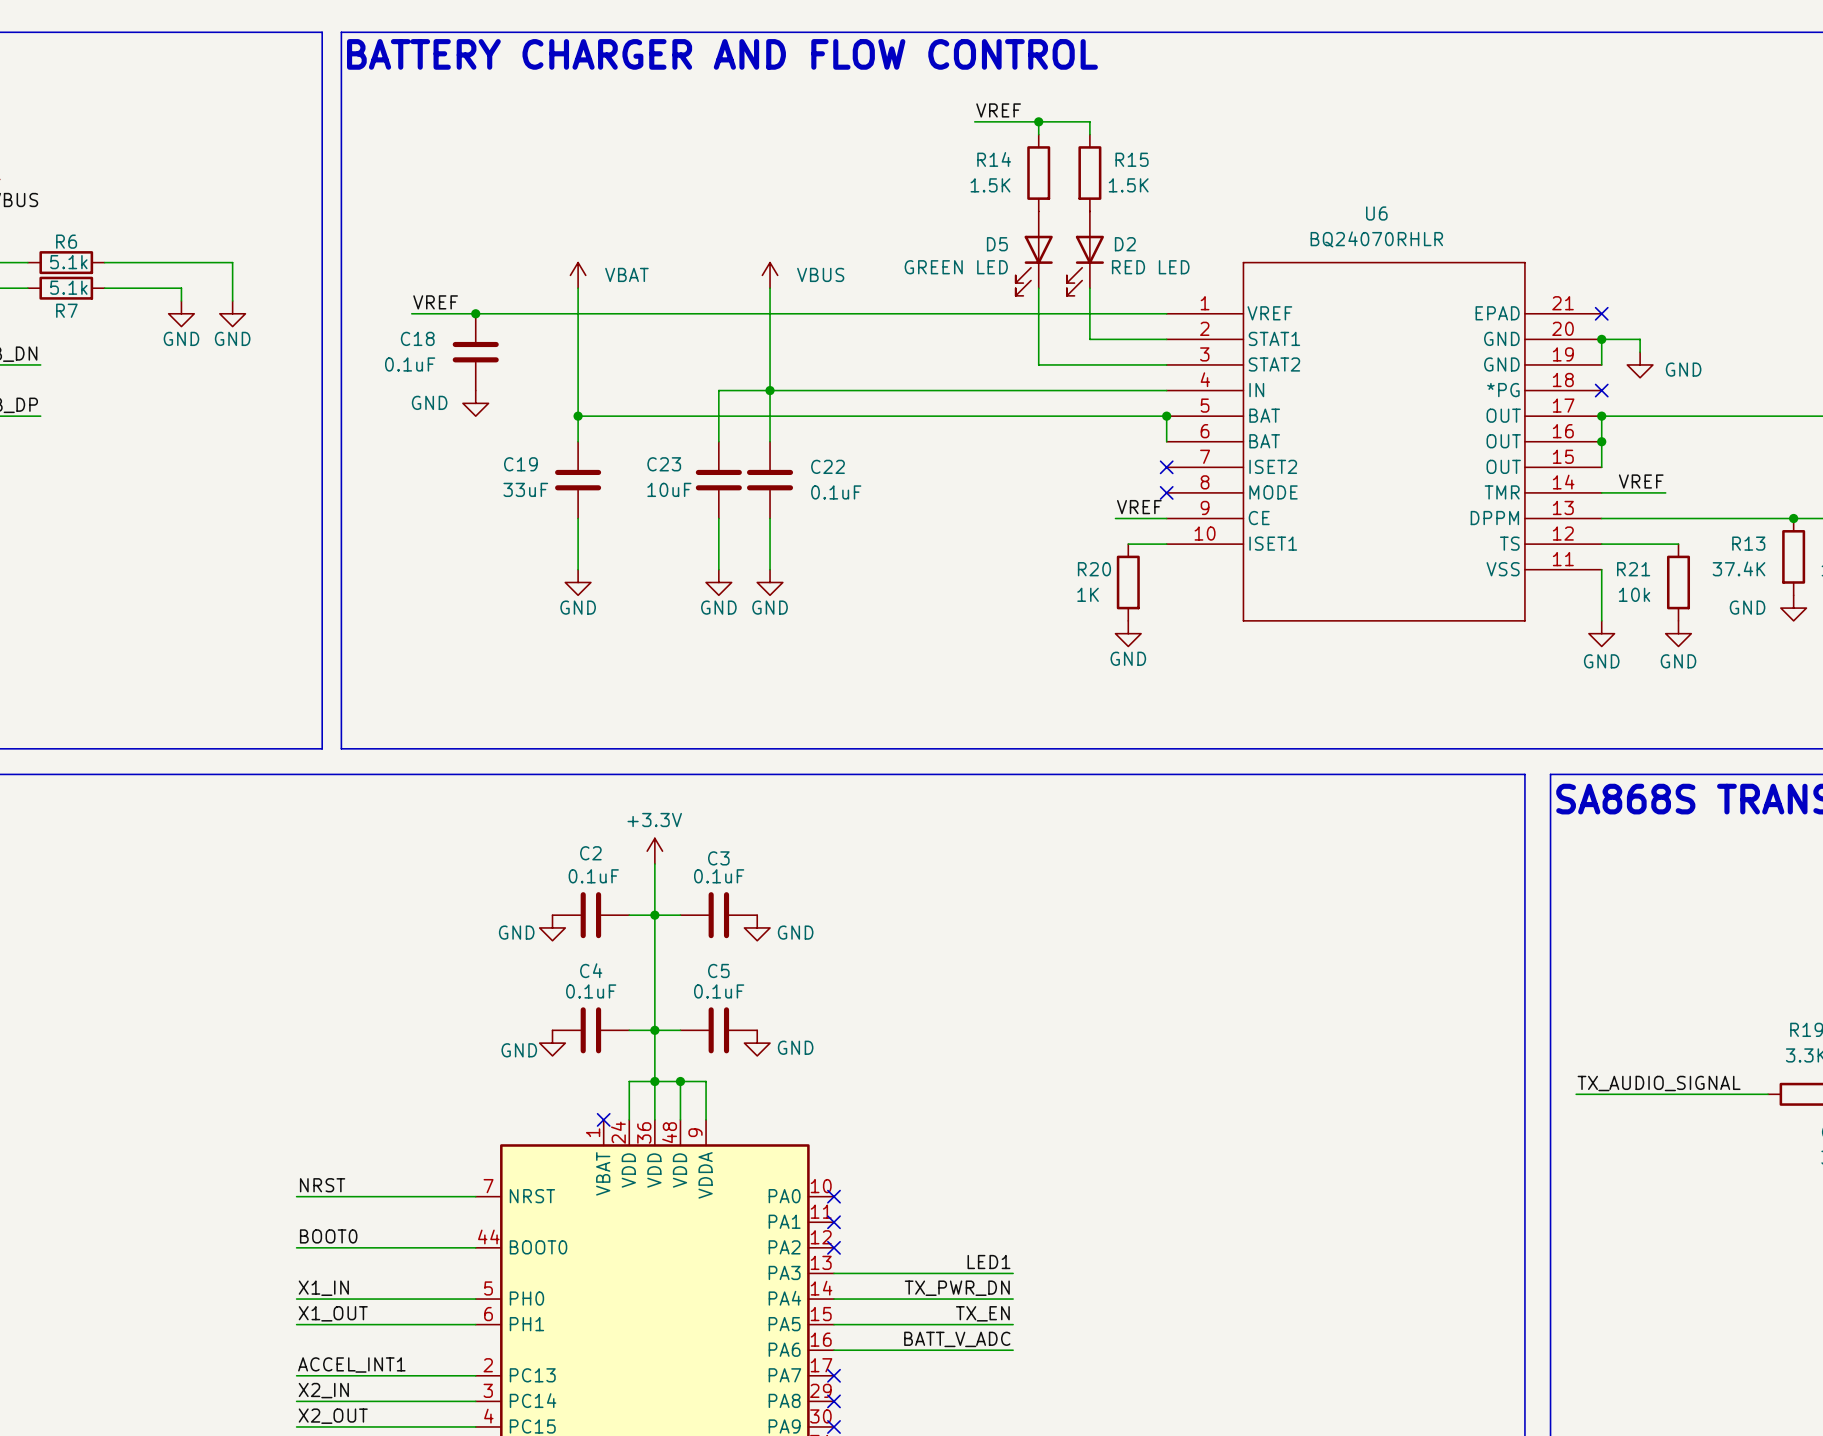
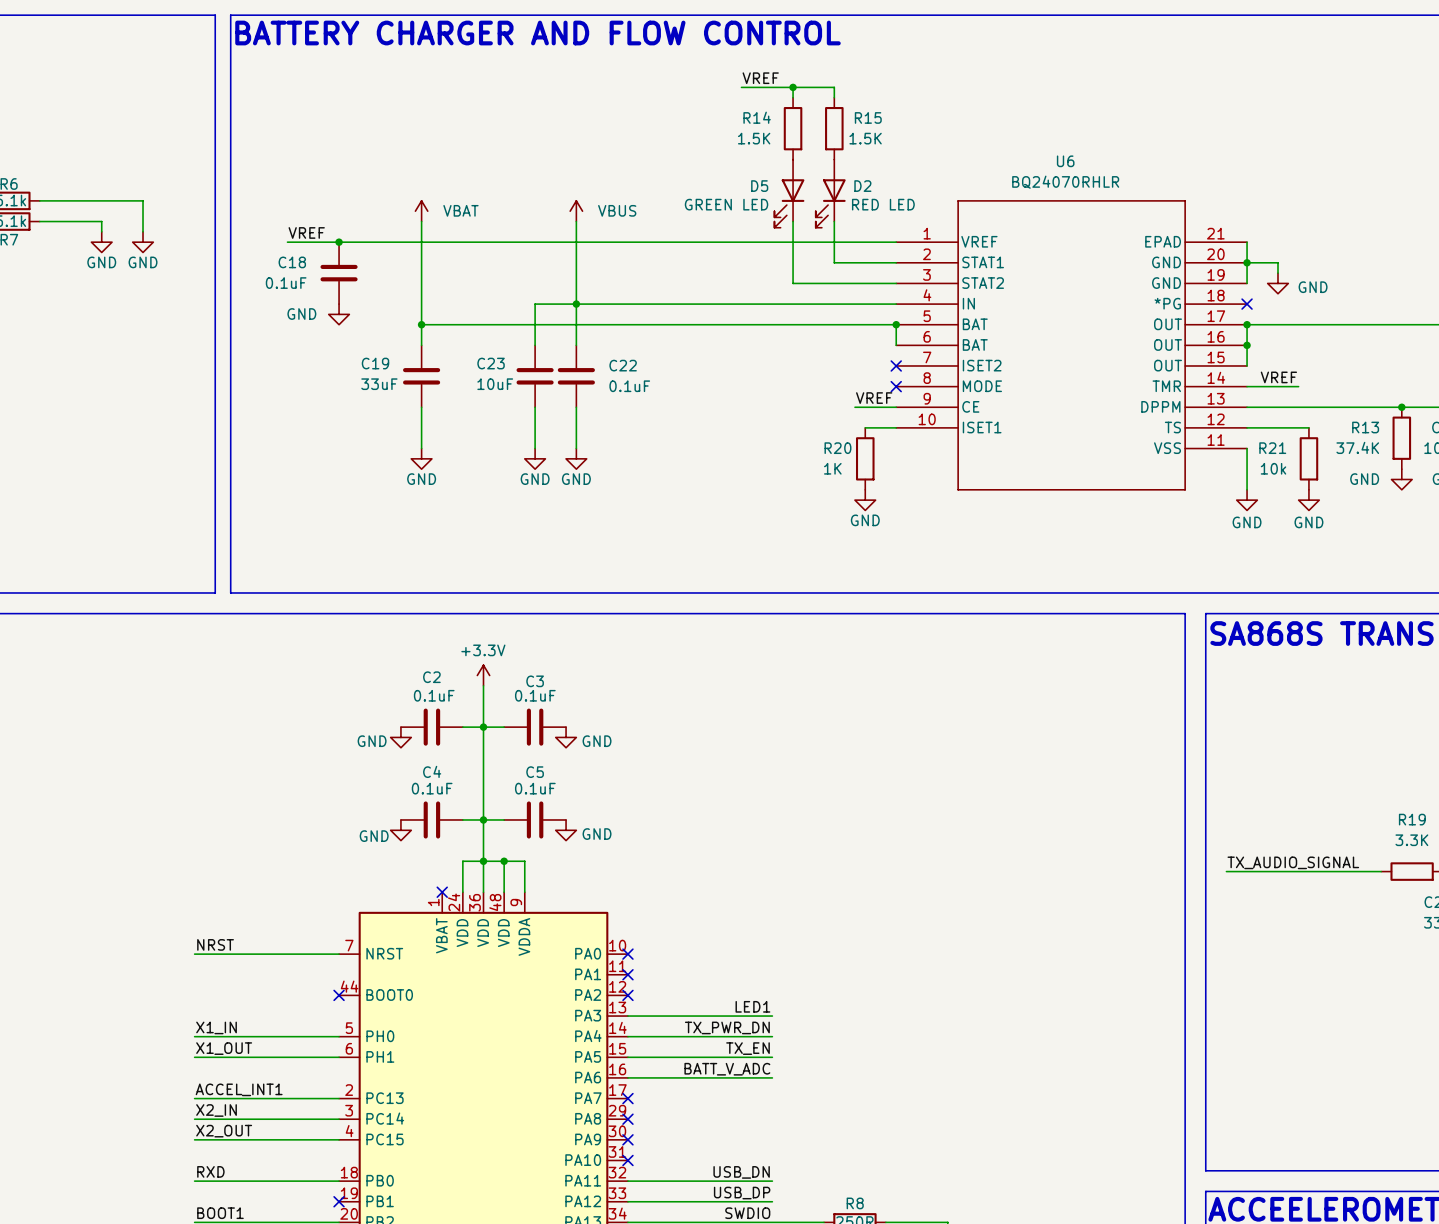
wire: none -> (1247, 242) (1247, 262)
no-connect mark: (1601, 313) -> none
label: BOOT0 (328, 1236) -> none
wire: (296, 1247) (475, 1247) -> none
no-connect mark: none -> (339, 995)

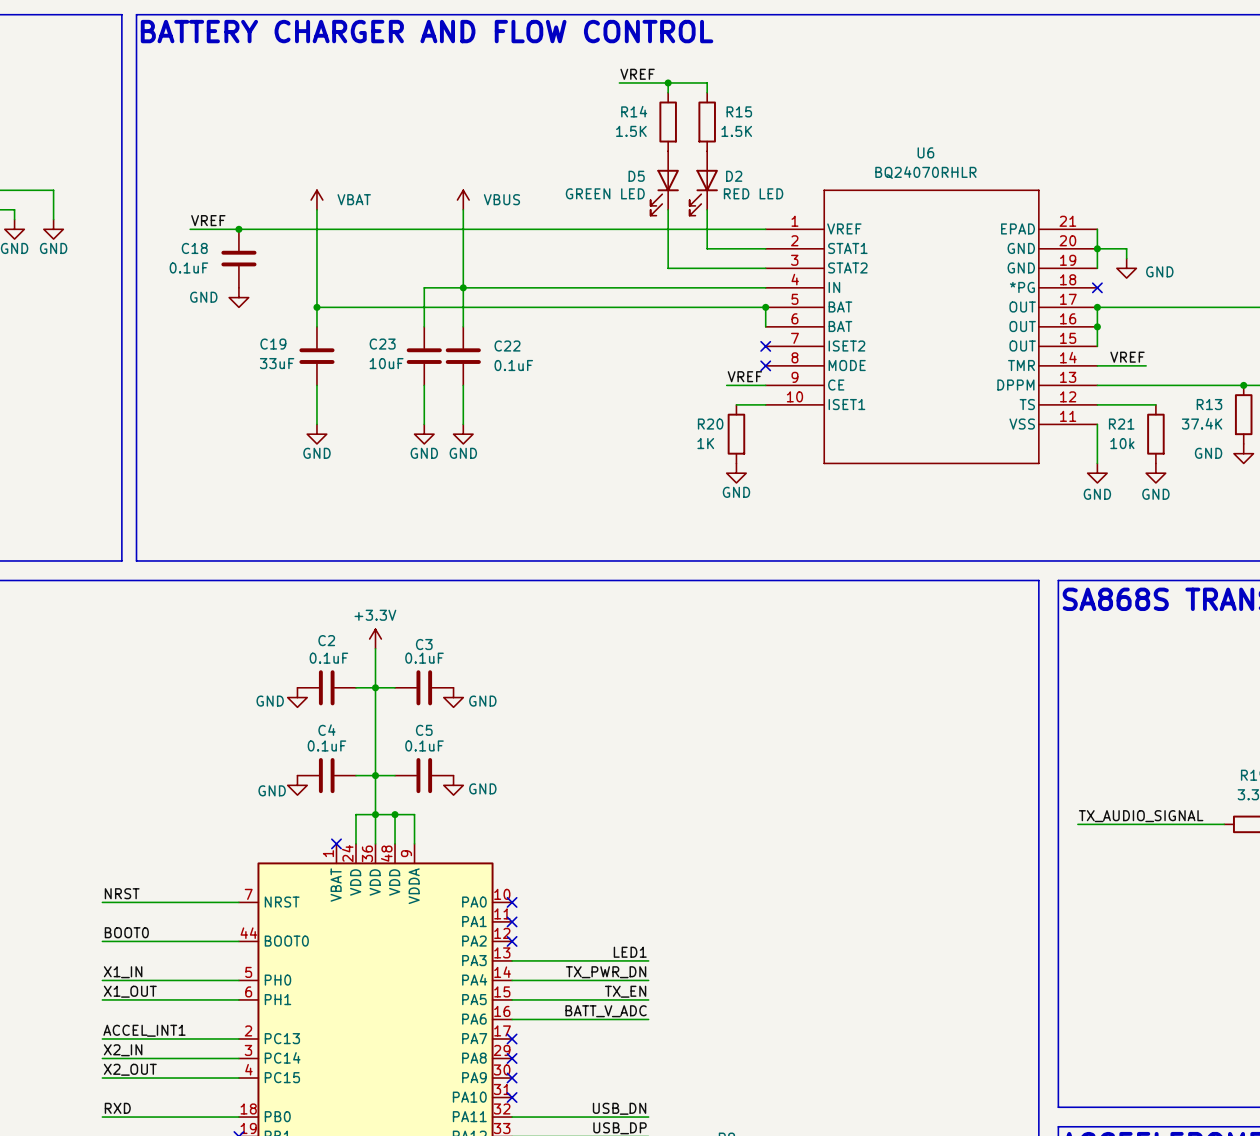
label: none -> BOOT0 (126, 932)
wire: none -> (102, 941) (238, 941)
no-connect mark: (339, 995) -> none

